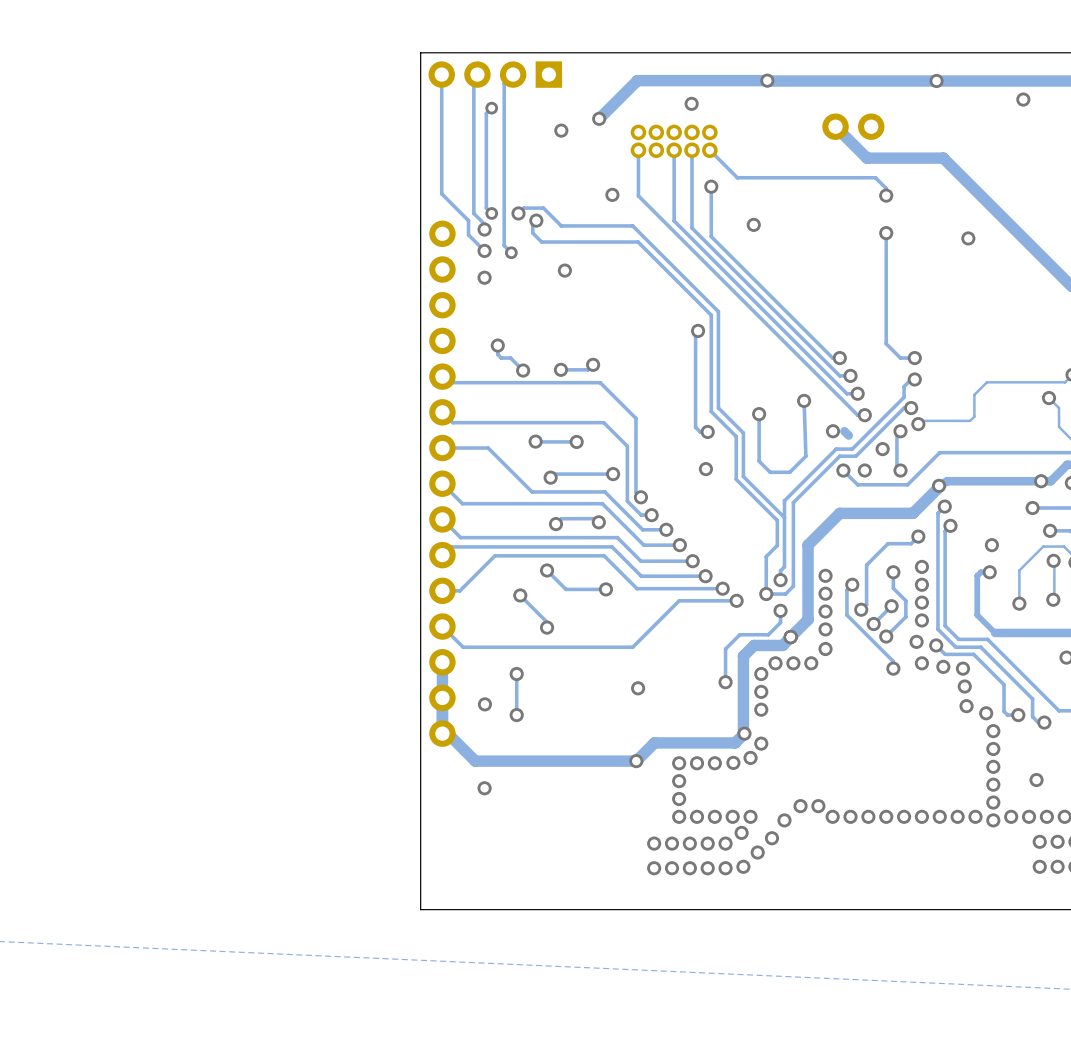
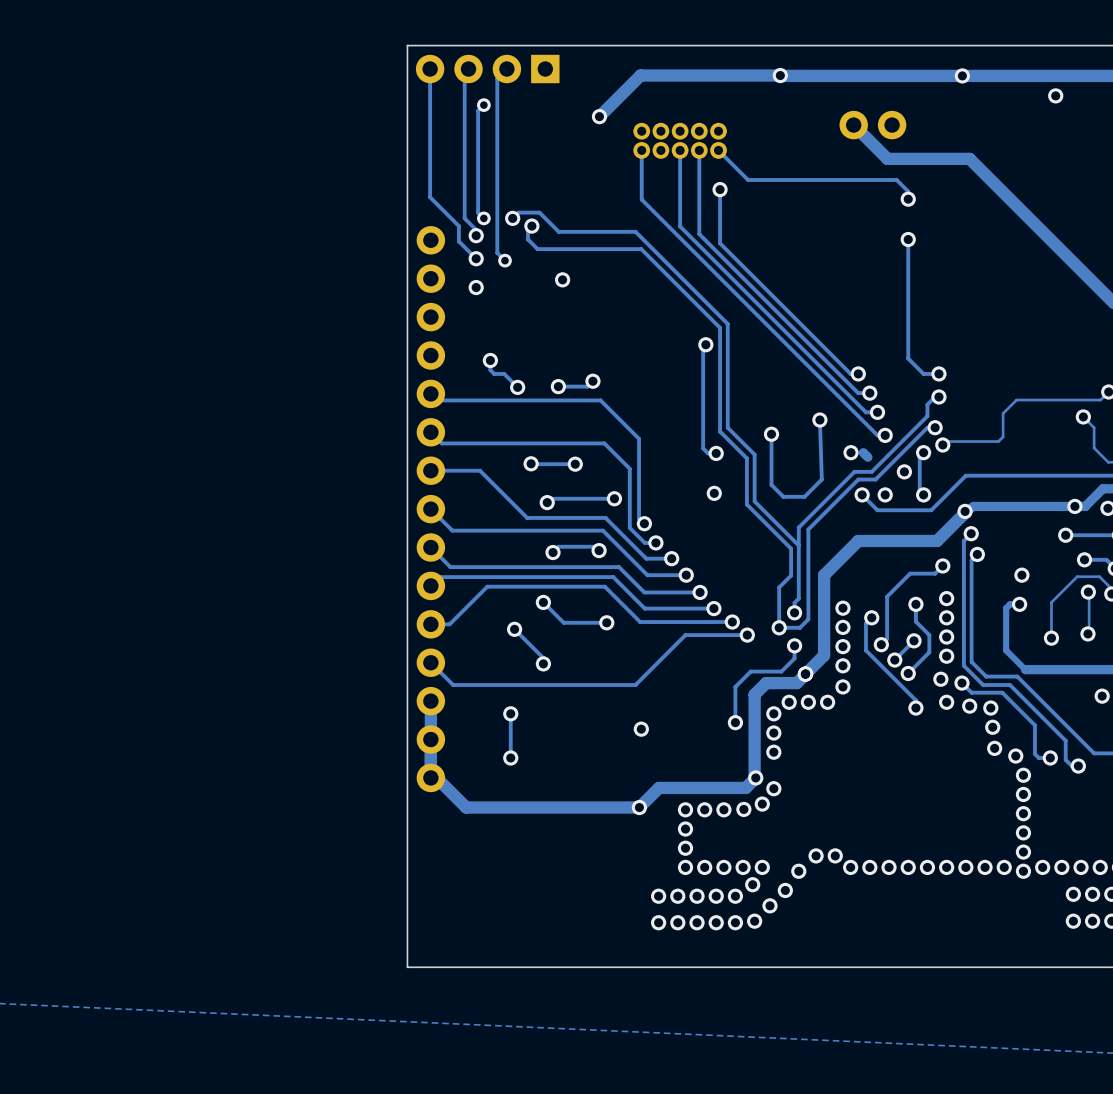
via: (691, 103) -> none
via: (561, 130) -> none
via: (612, 194) -> none
via: (753, 224) -> none
via: (968, 238) -> none
via: (484, 704) -> none
via: (1036, 780) -> none
via: (484, 788) -> none

